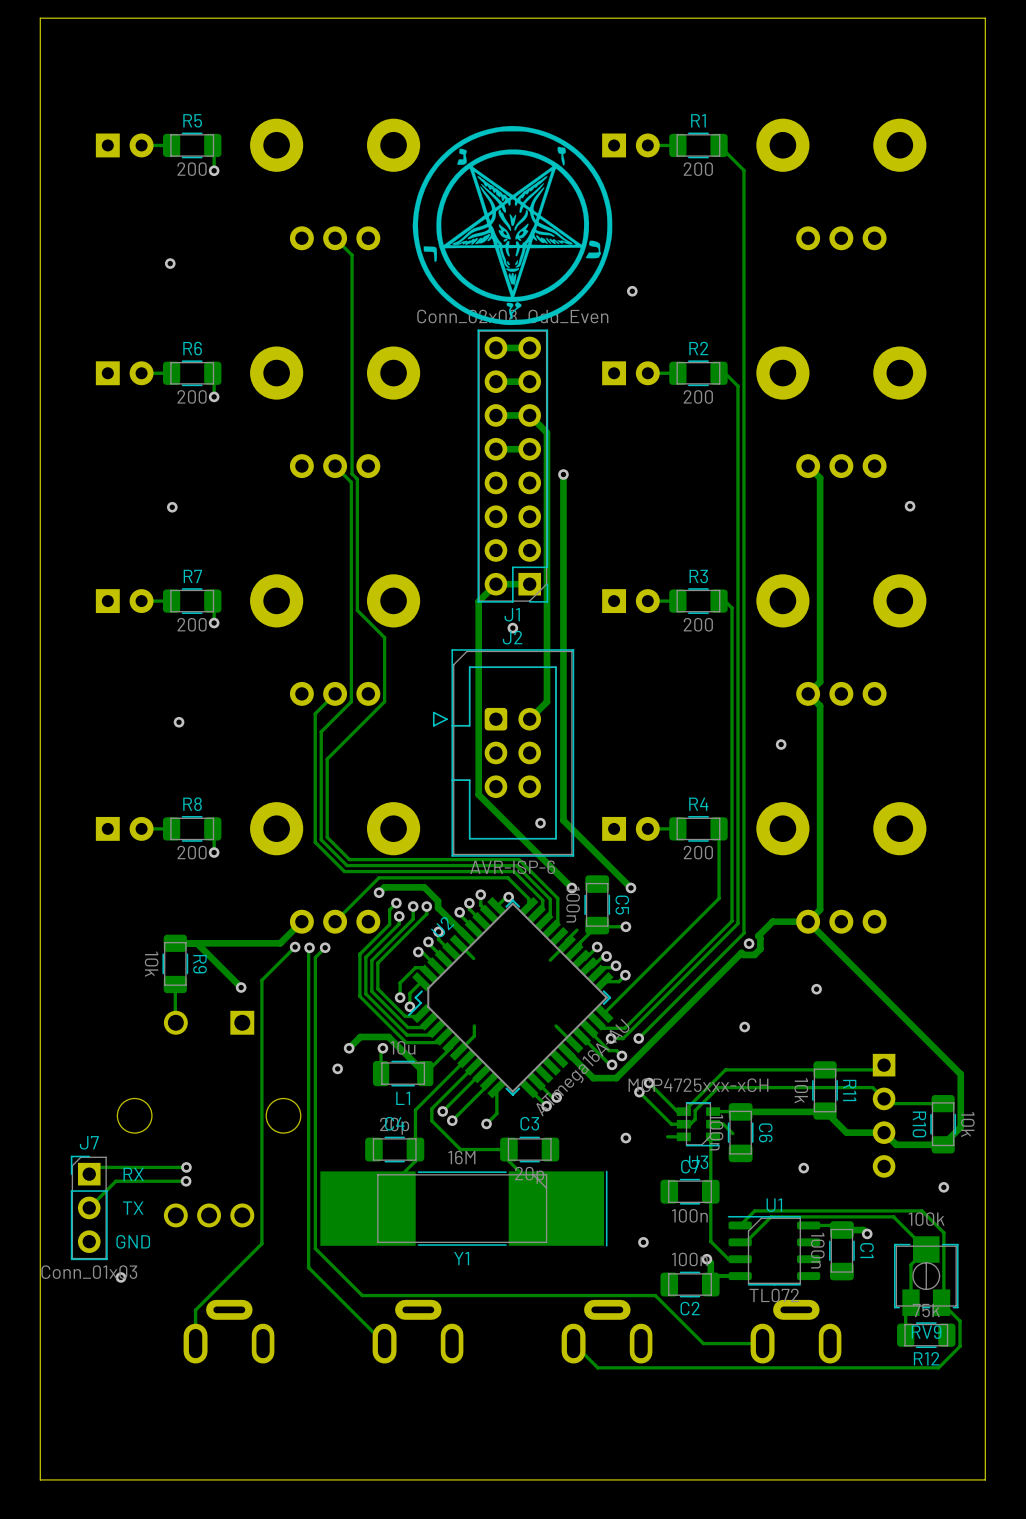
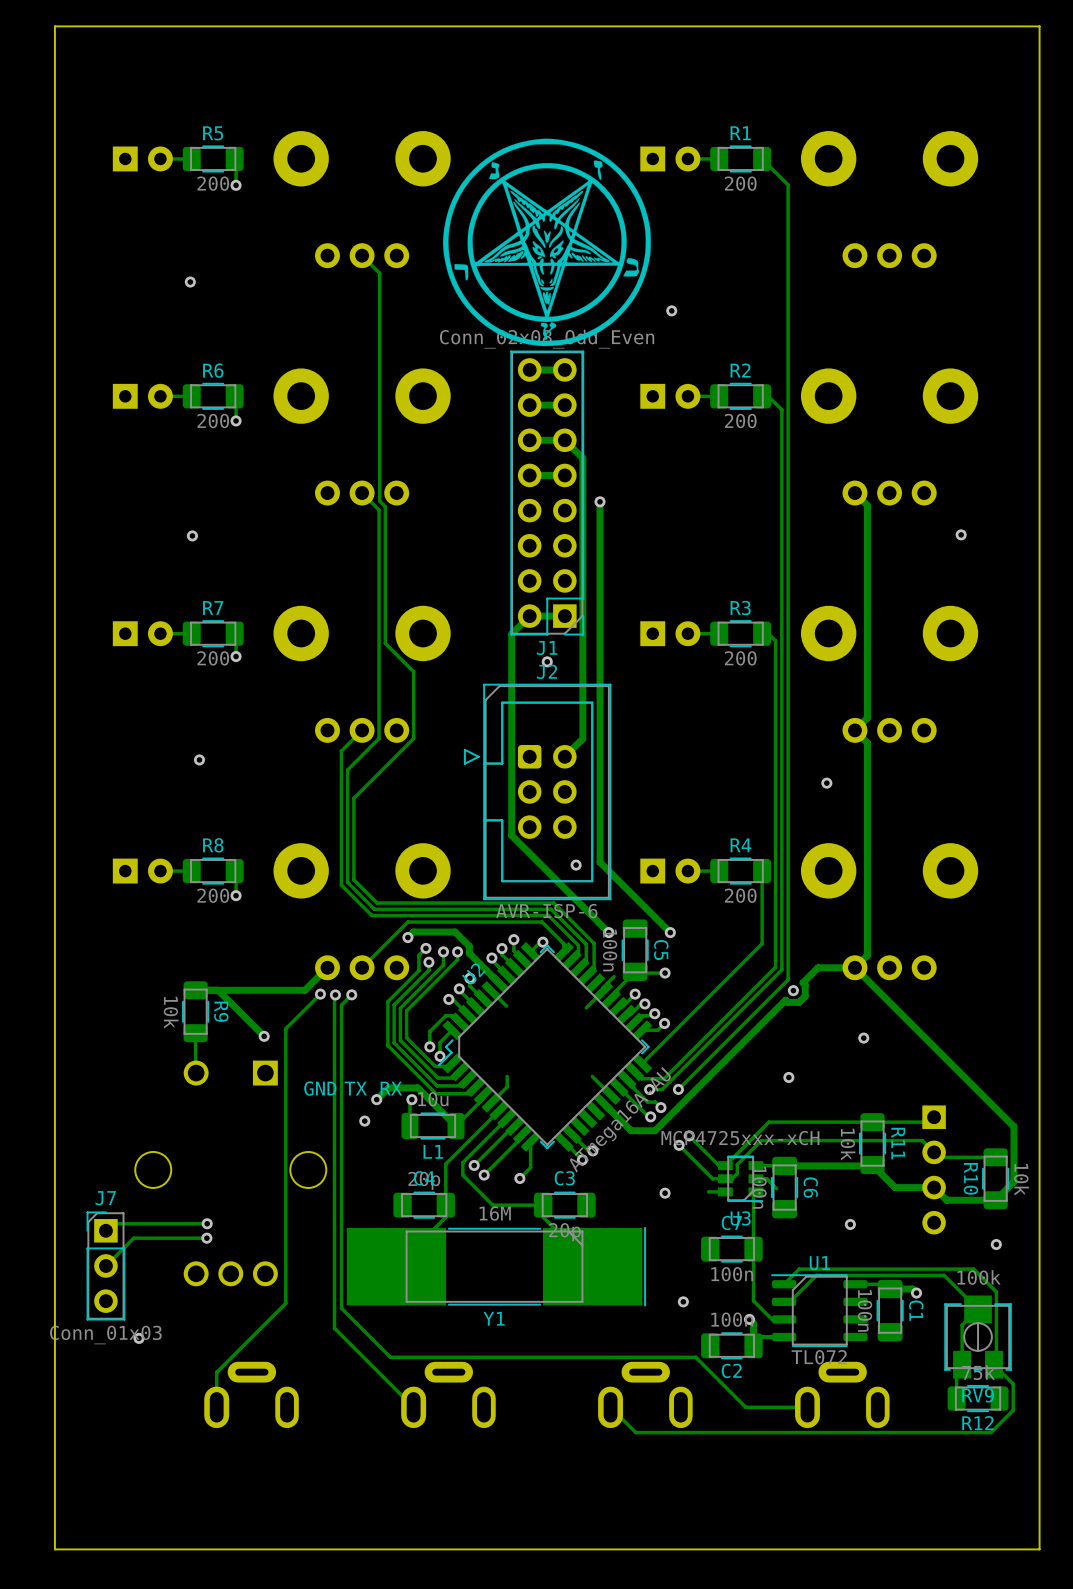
text position: RX (133, 1174) -> RX (391, 1088)
text position: TX (133, 1208) -> TX (355, 1088)
text position: GND (133, 1241) -> GND (320, 1088)

